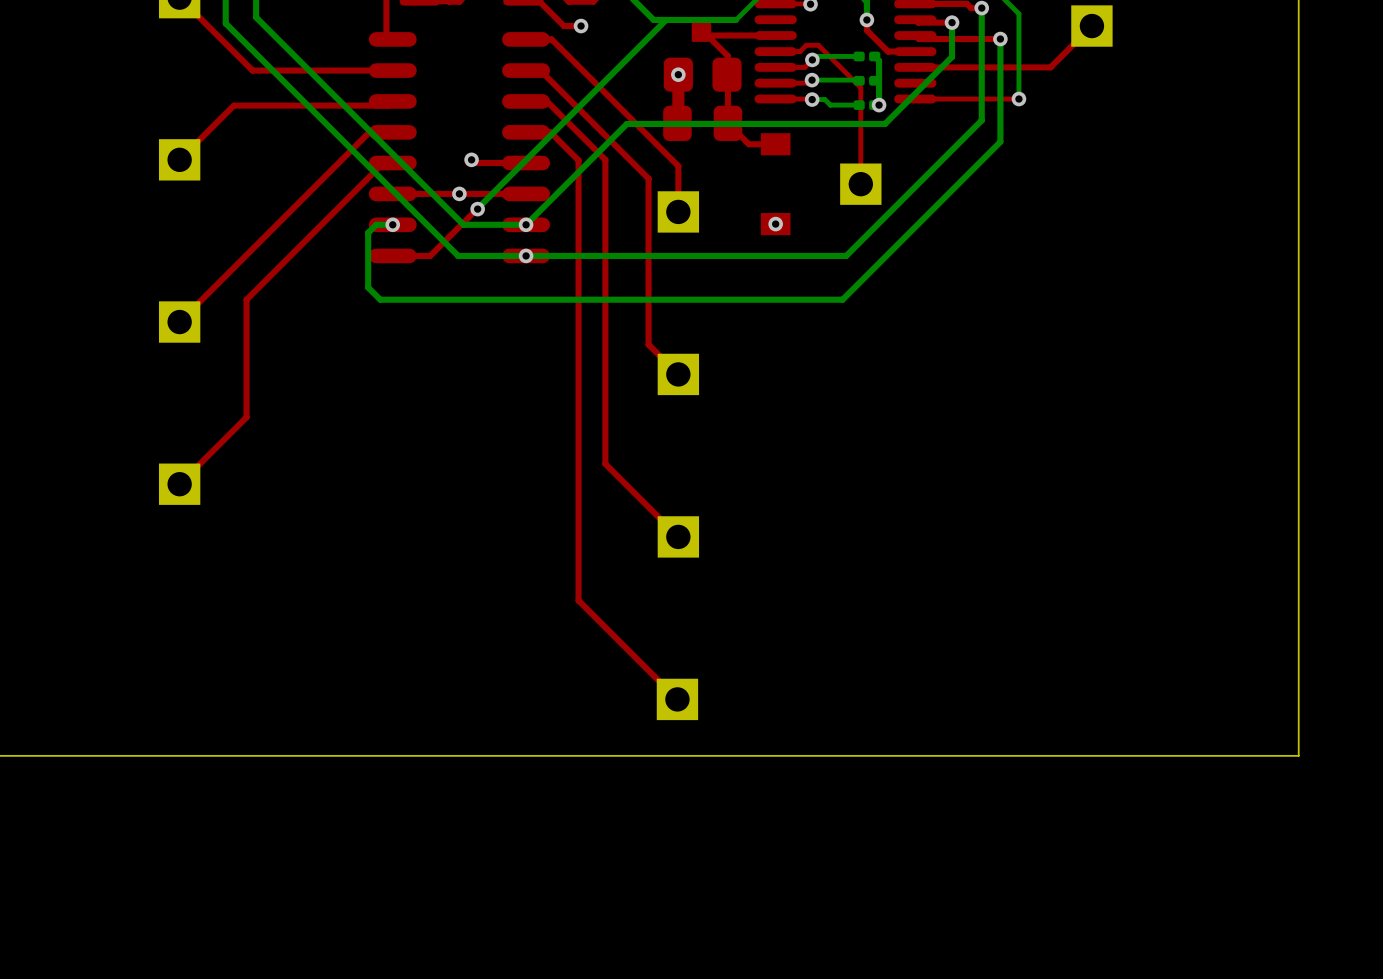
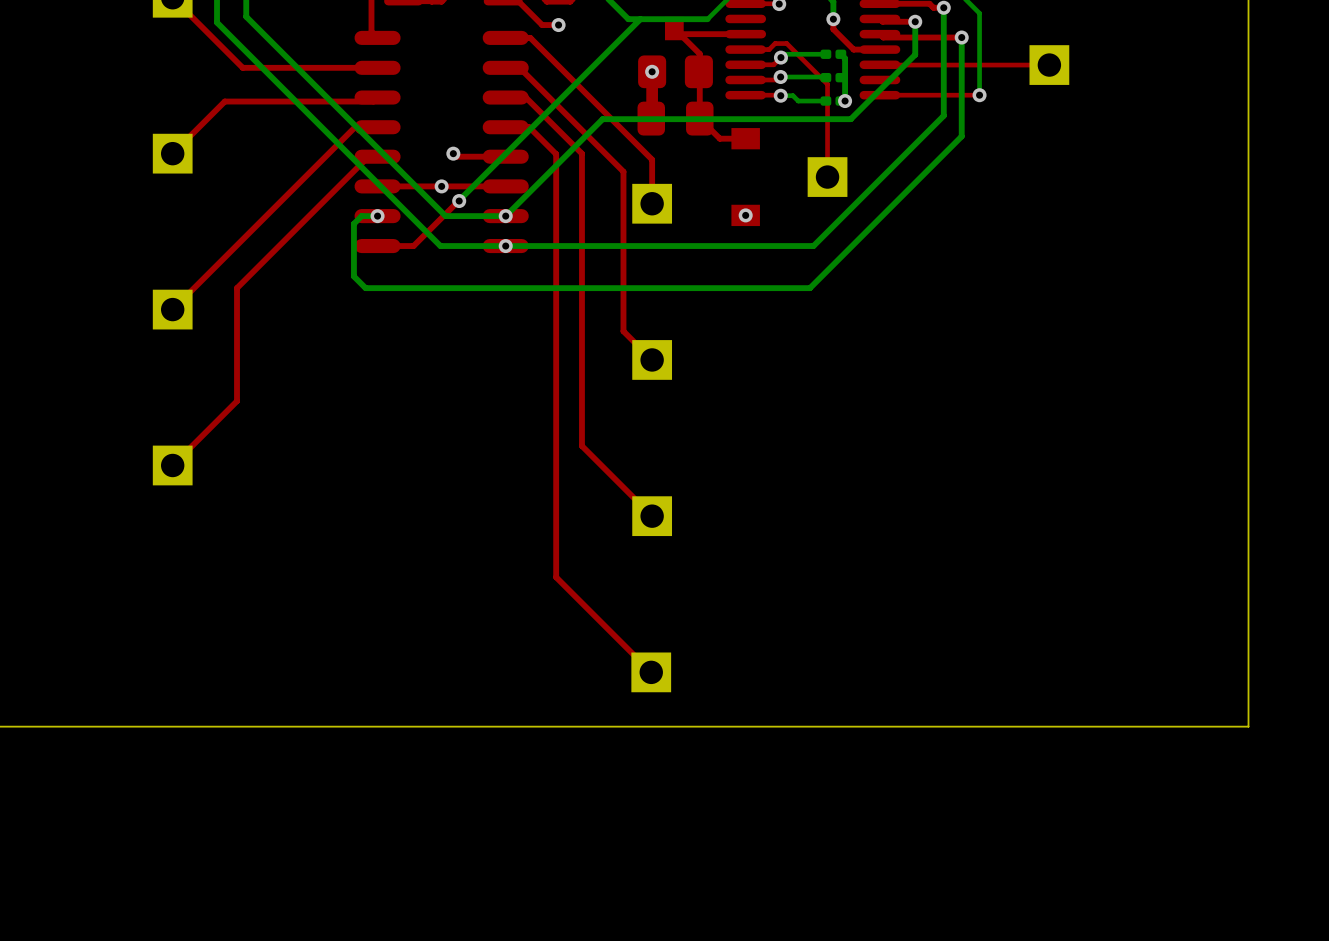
top track: (1091, 26) (1050, 67) (915, 67) -> (1049, 65) (880, 65)
part position: (1091, 26) -> (1049, 65)

